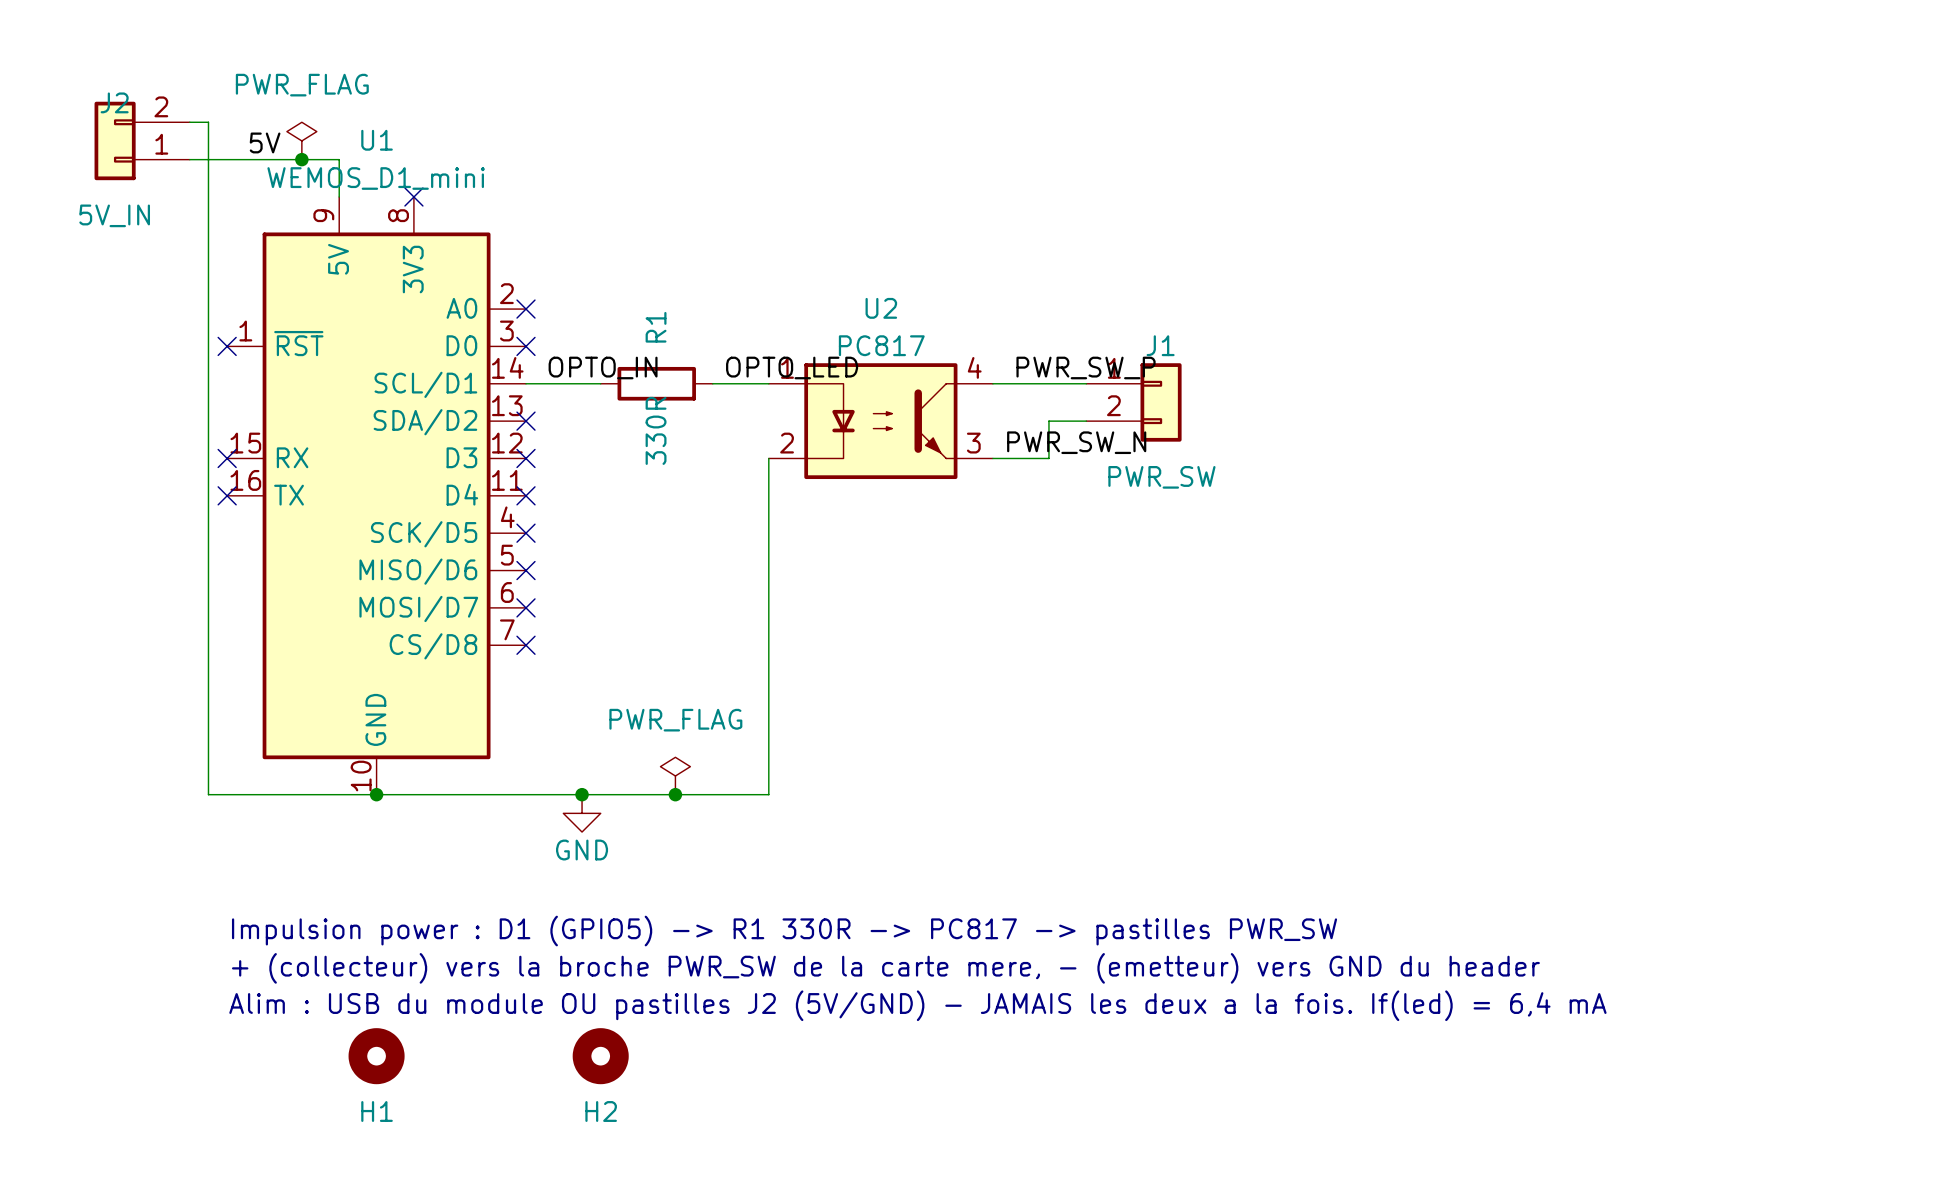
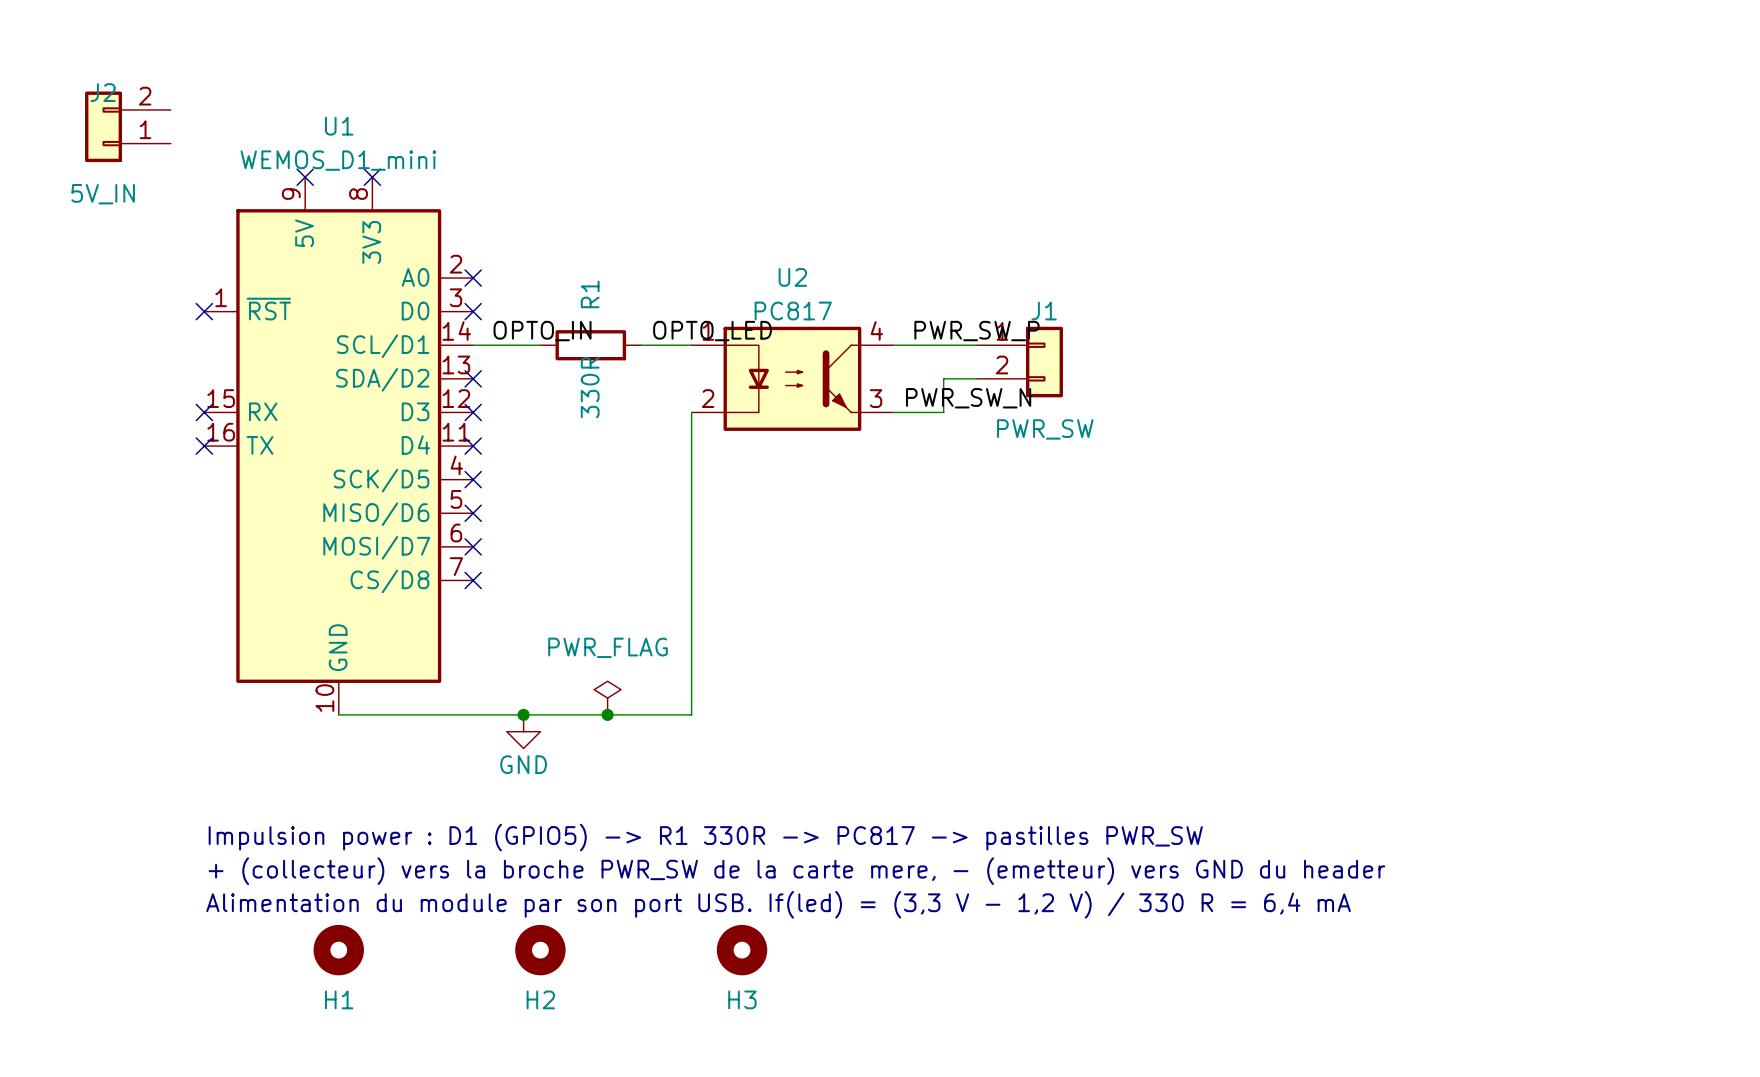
wire: (189, 122) (208, 122) (208, 794) (376, 794) -> none
power symbol: PWR_FLAG (301, 140) -> none
label: 5V (265, 142) -> none
wire: (189, 159) (339, 159) (339, 196) -> none
junction: (301, 159) -> none
no-connect mark: none -> (305, 177)
junction: (376, 794) -> none
text: Alim : USB du module OU pastilles J2 (5V/GND) - JAMAIS les deux a la fois. If(led) = 6,4 mA (917, 1005) -> Alimentation du module par son port USB. If(led) = (3,3 V - 1,2 V) / 330 R = 6,4 mA (778, 904)
H3: none -> (742, 950)

